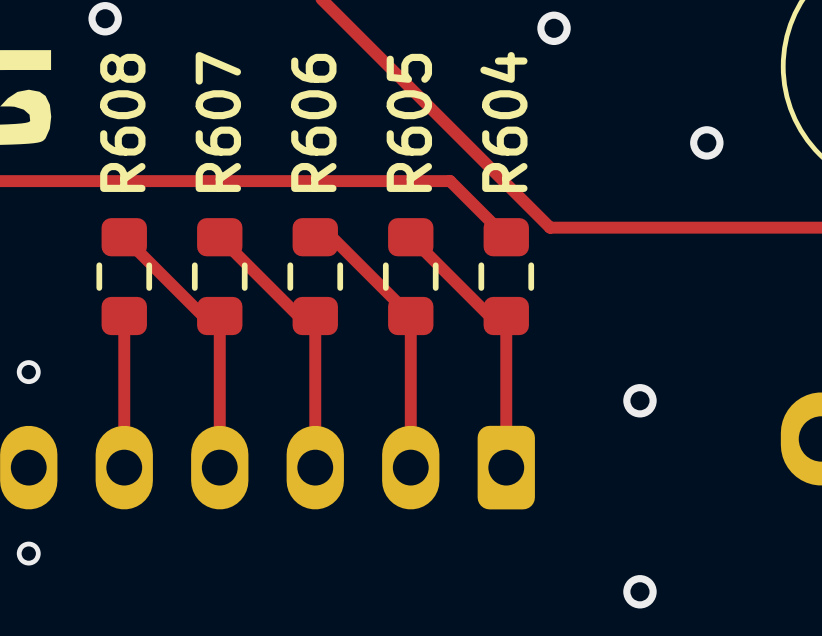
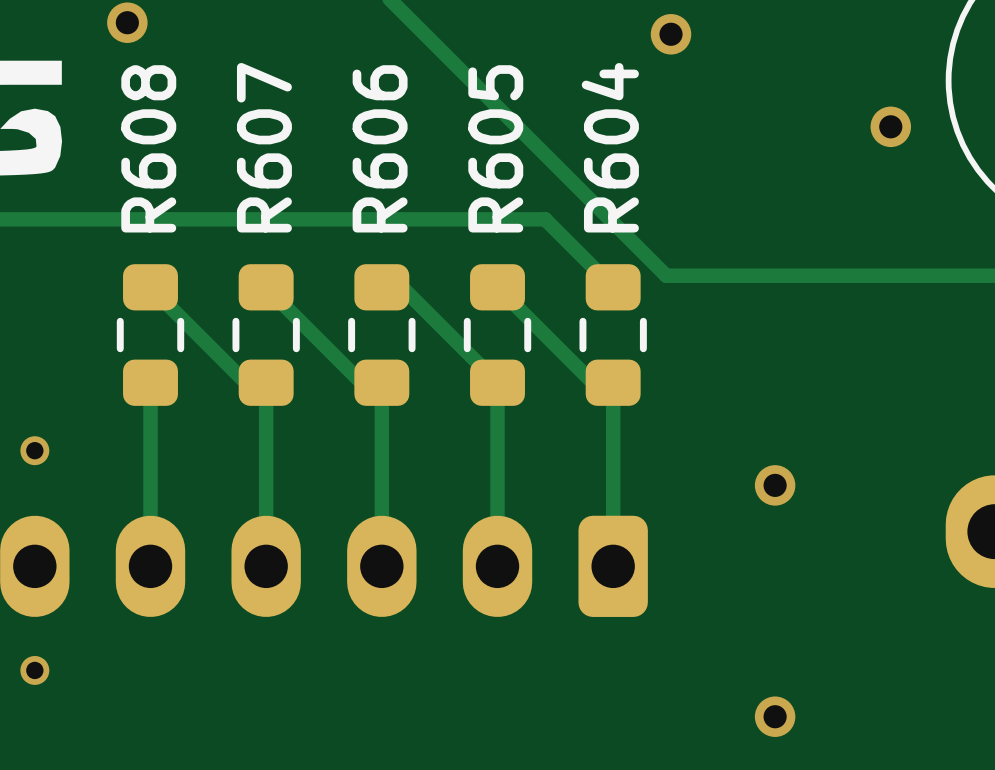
via position: (706, 142) -> (890, 126)

